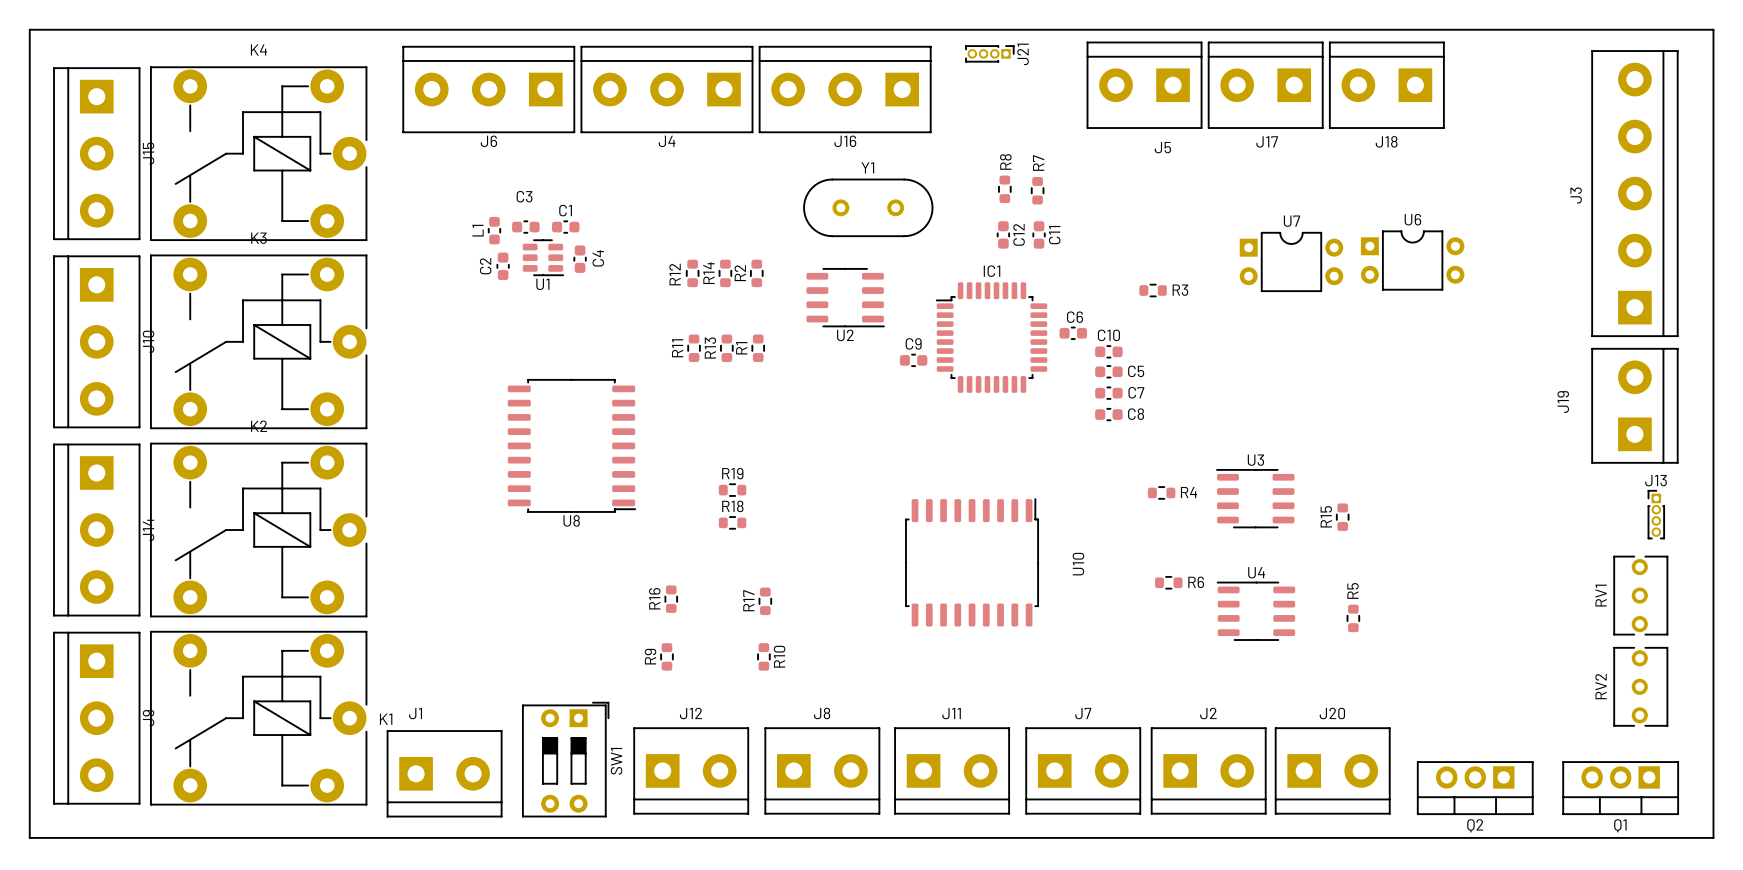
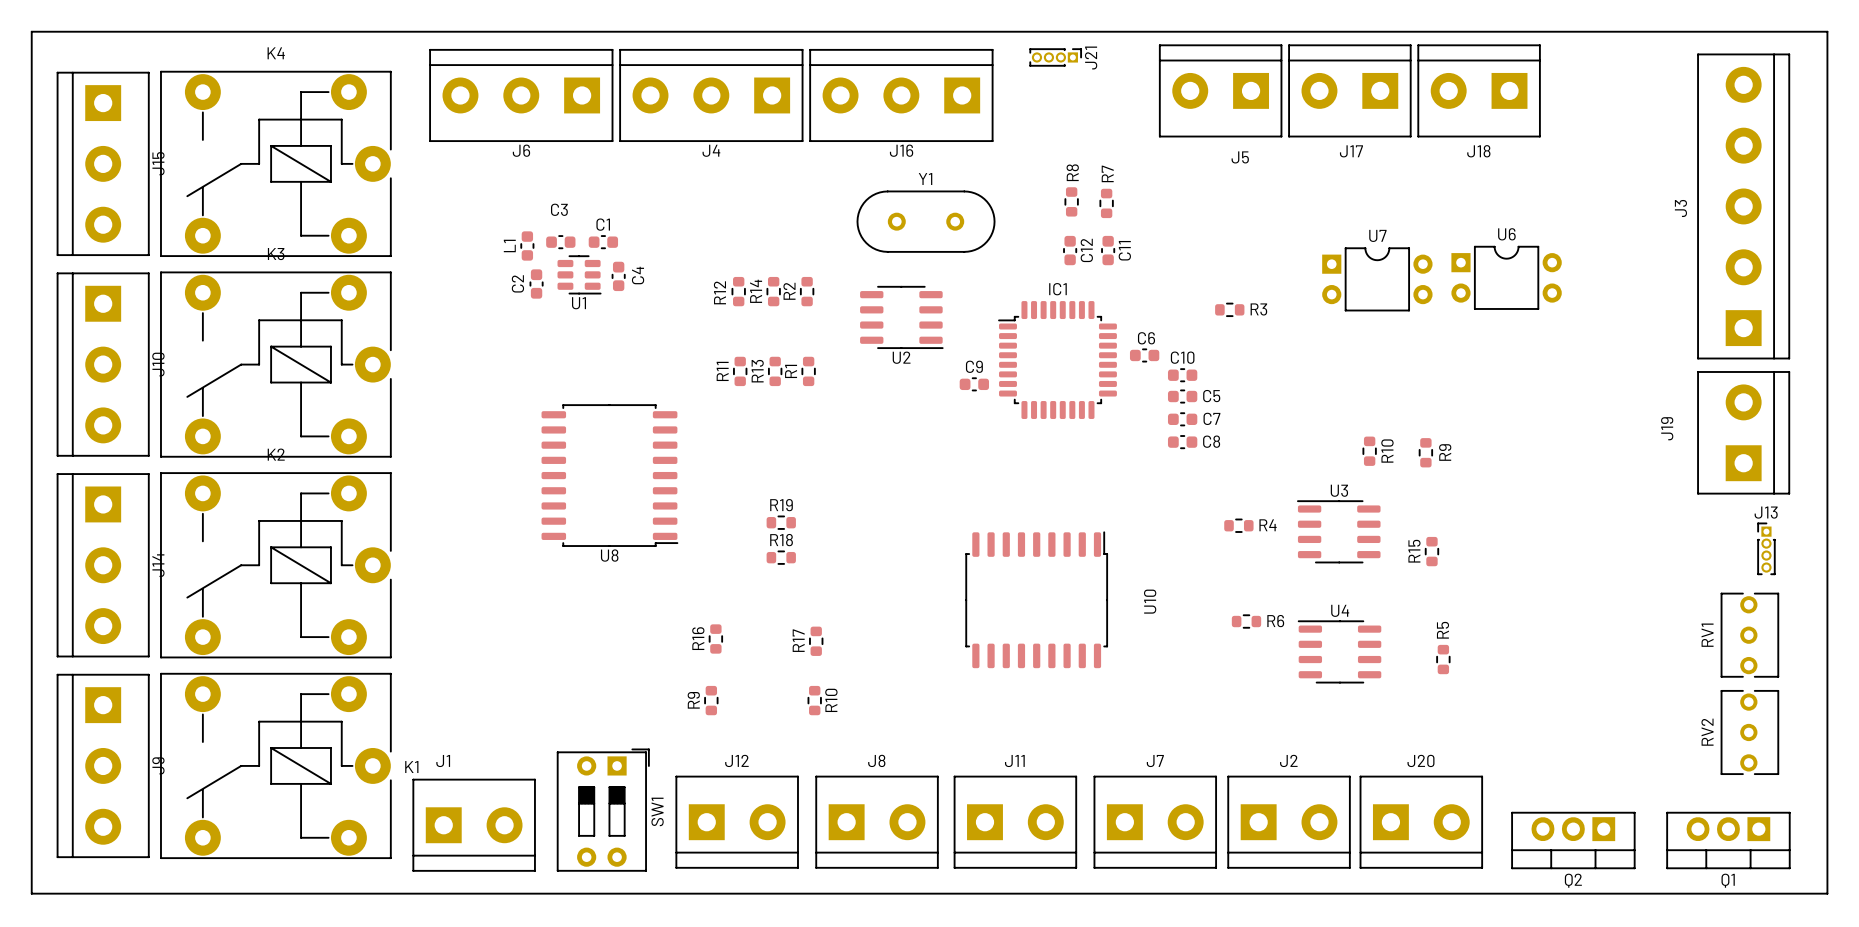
R10: none -> (1369, 451)
R9: none -> (1425, 452)

